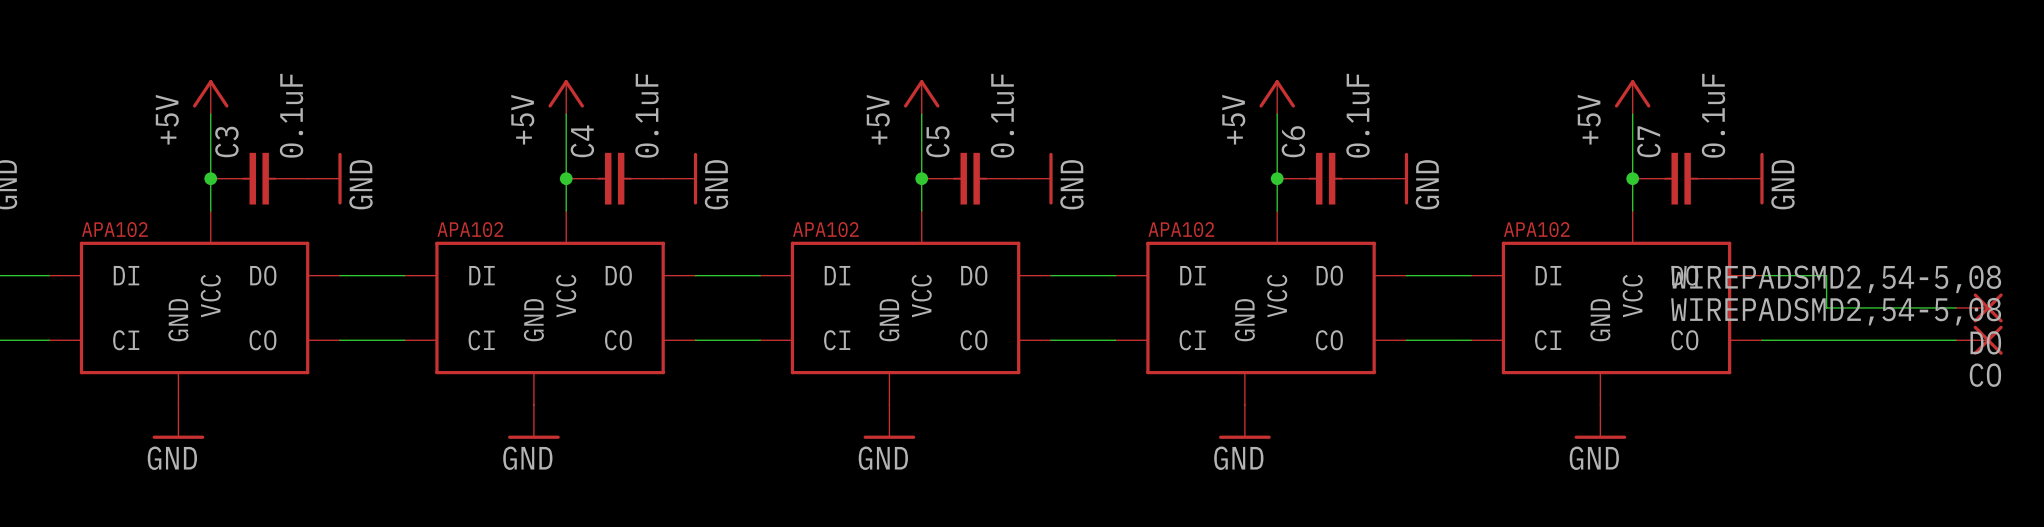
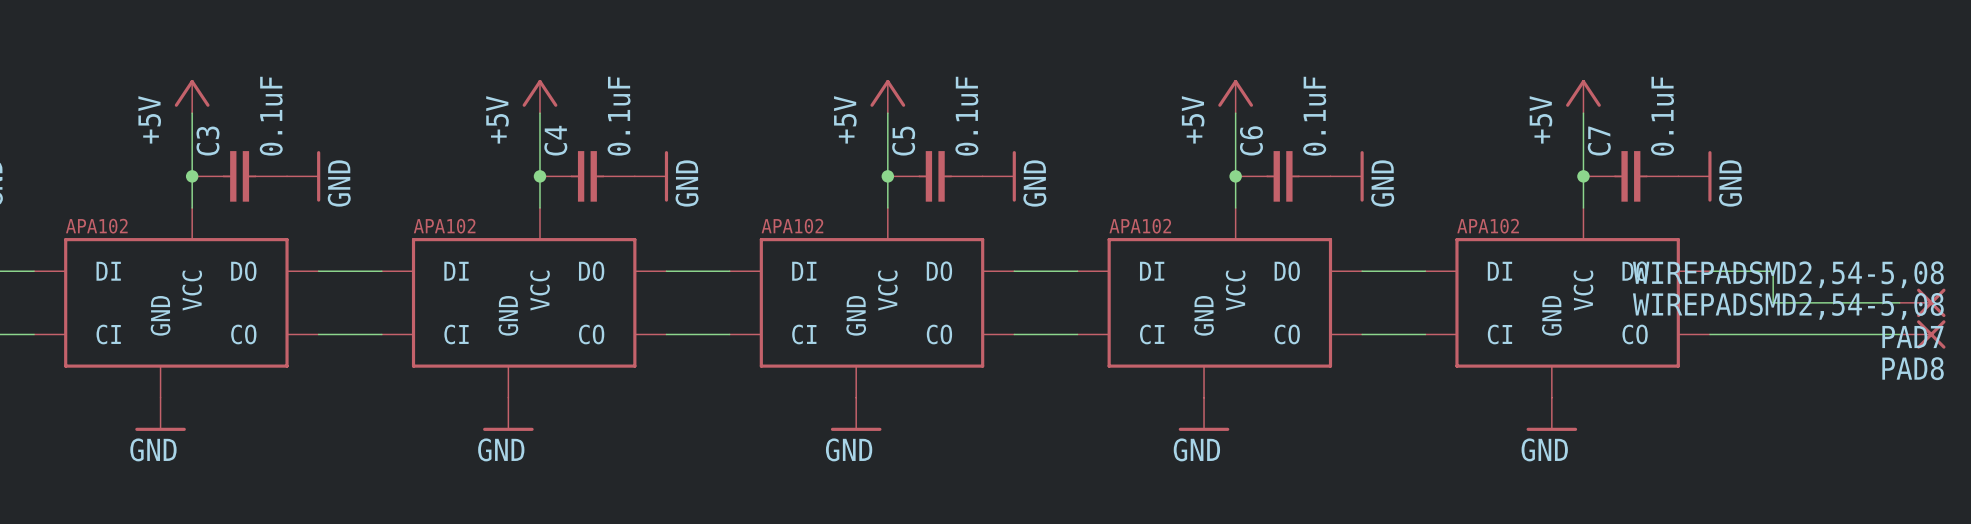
DO name: DO (1985, 342) -> PAD7 (1912, 337)
CO name: CO (1985, 375) -> PAD8 (1913, 368)

